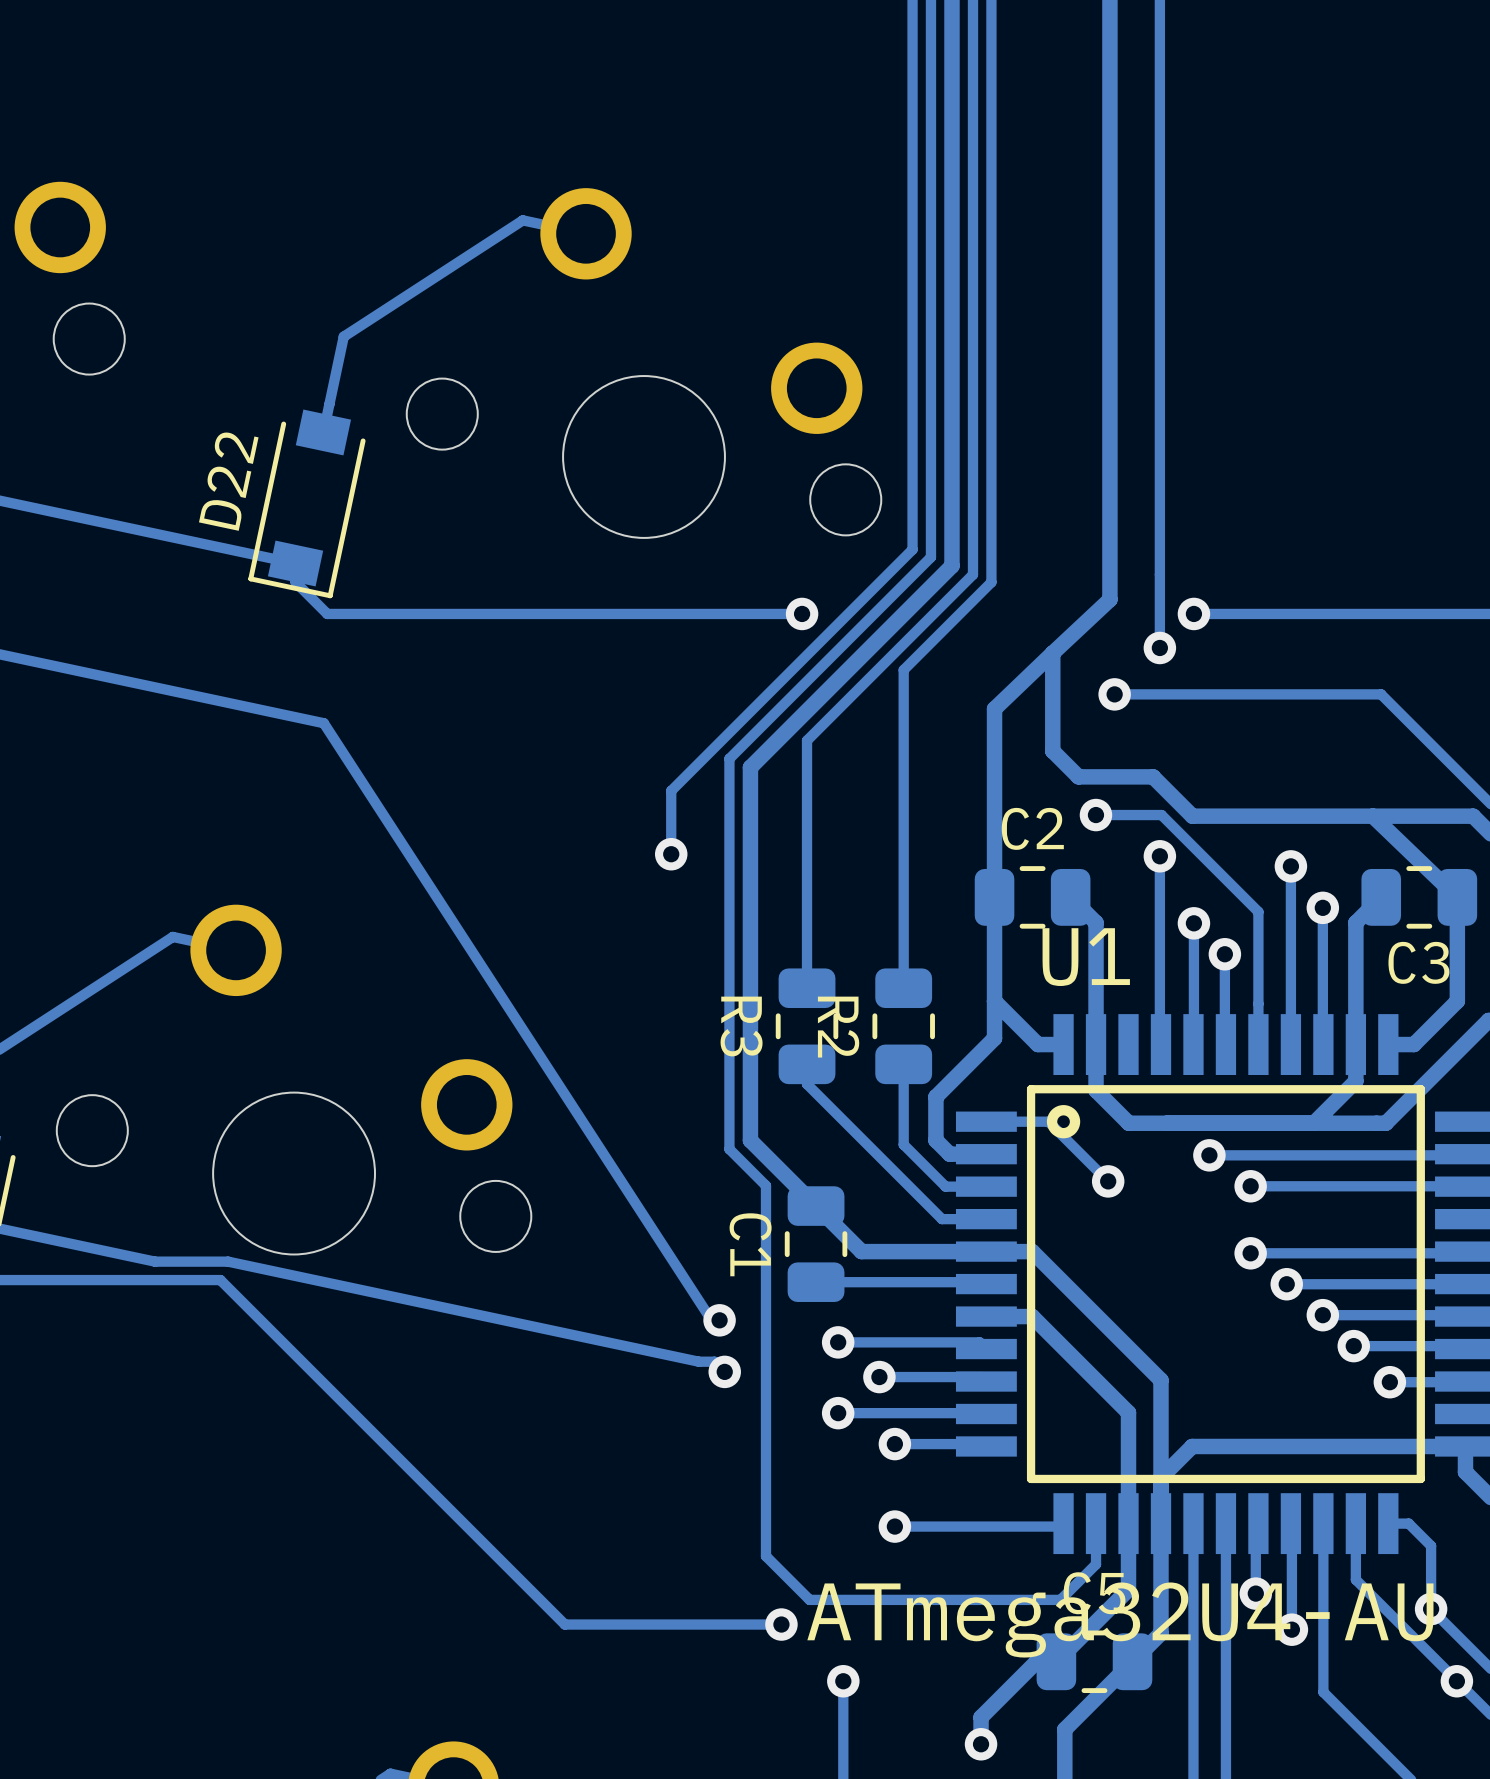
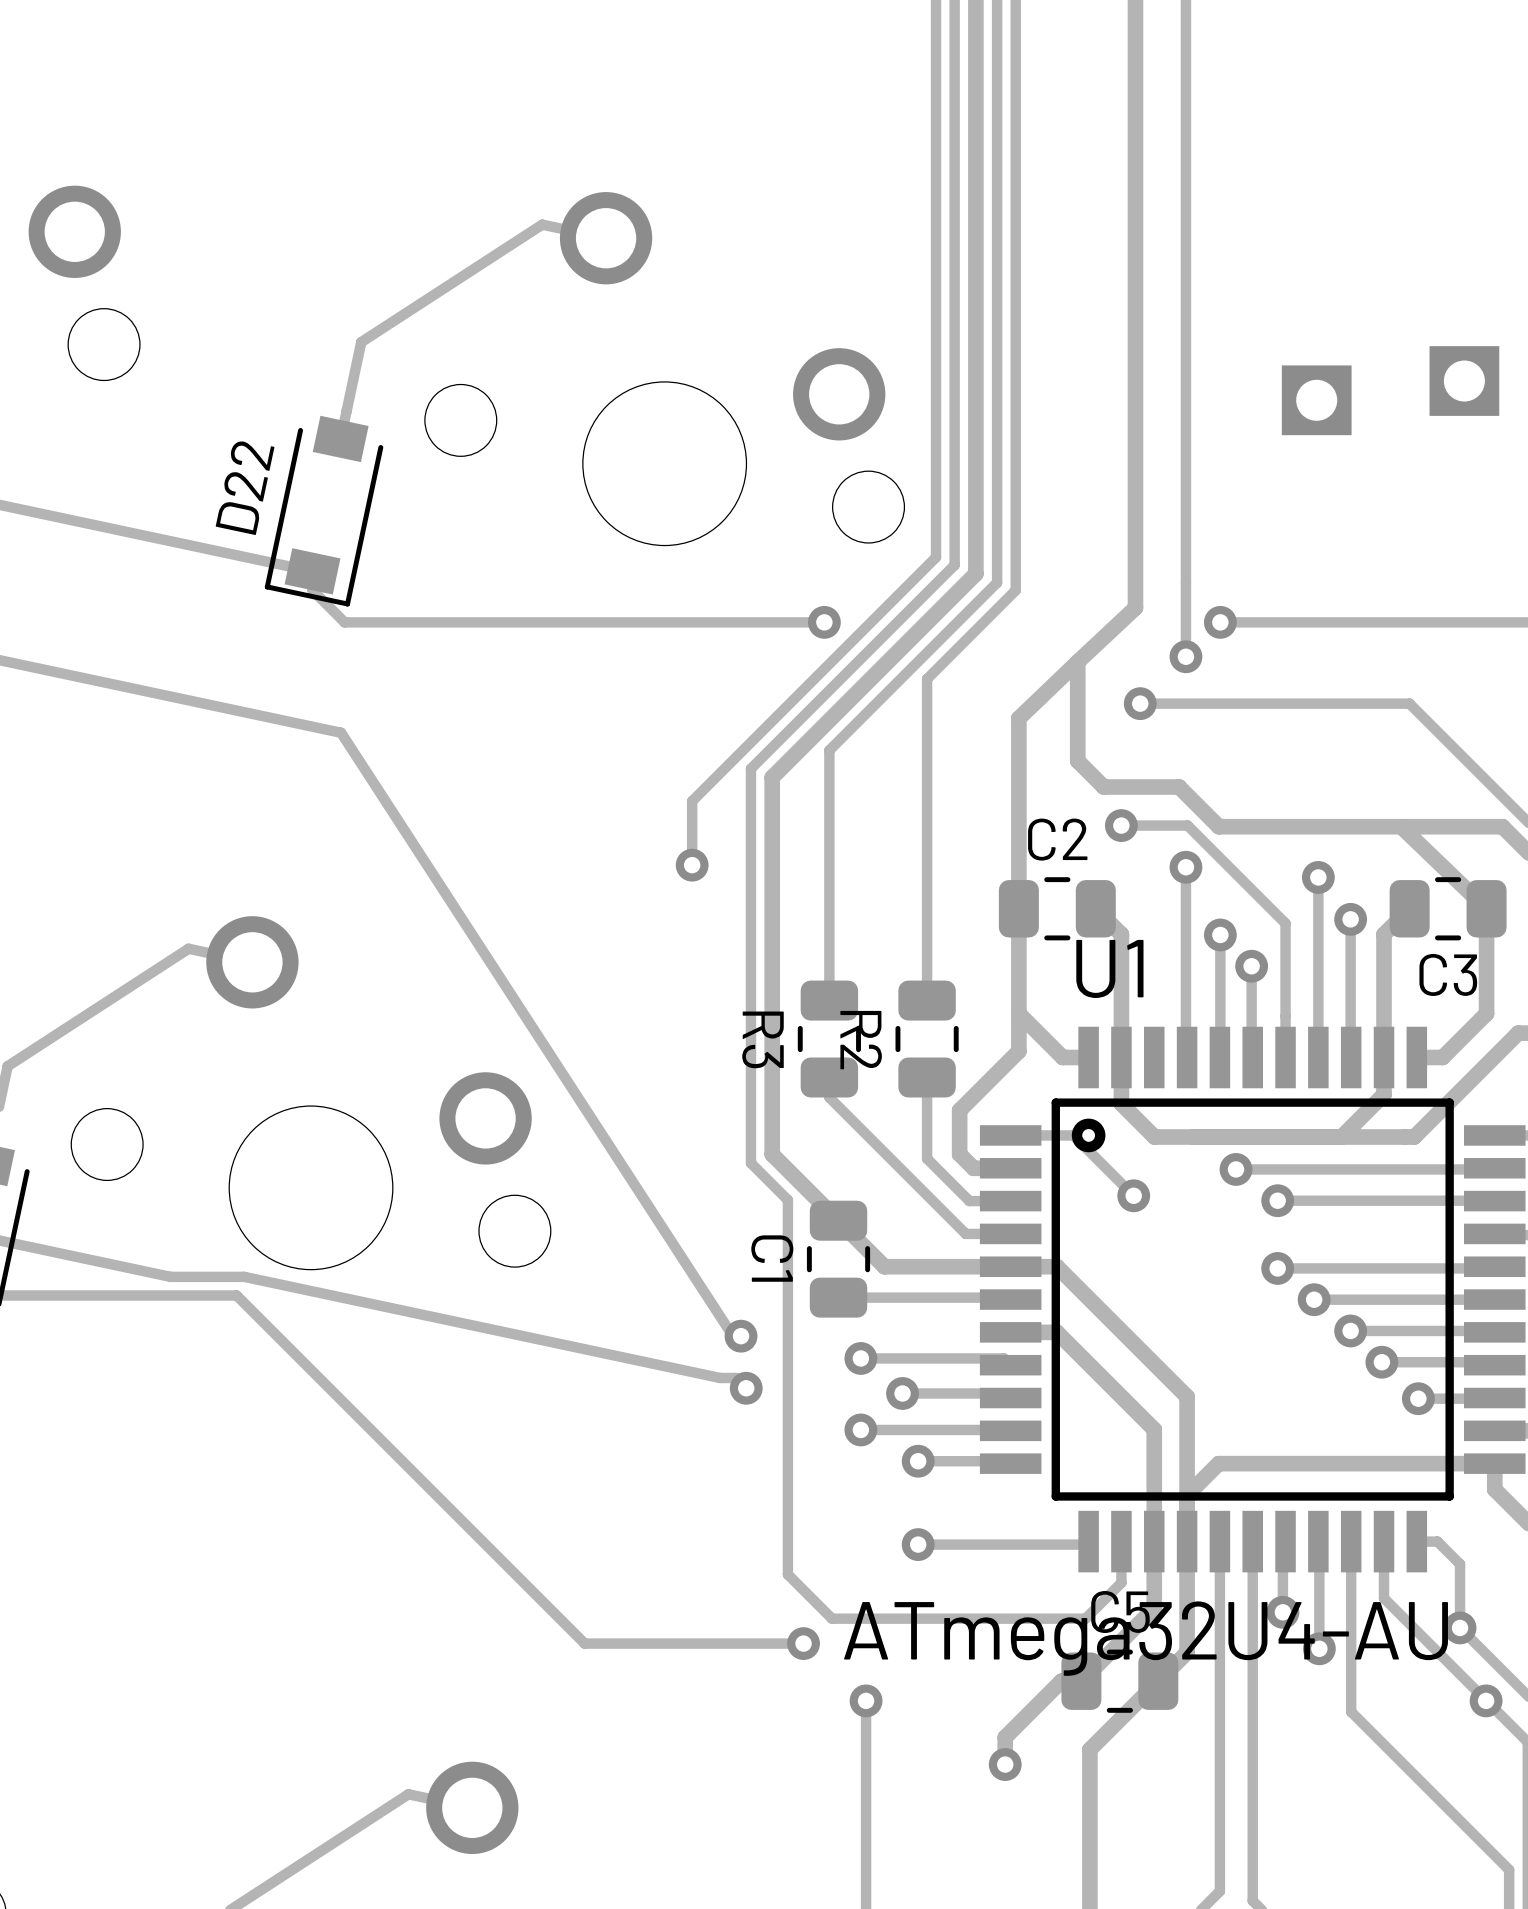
part: none -> (1464, 381)
part: none -> (1316, 400)

